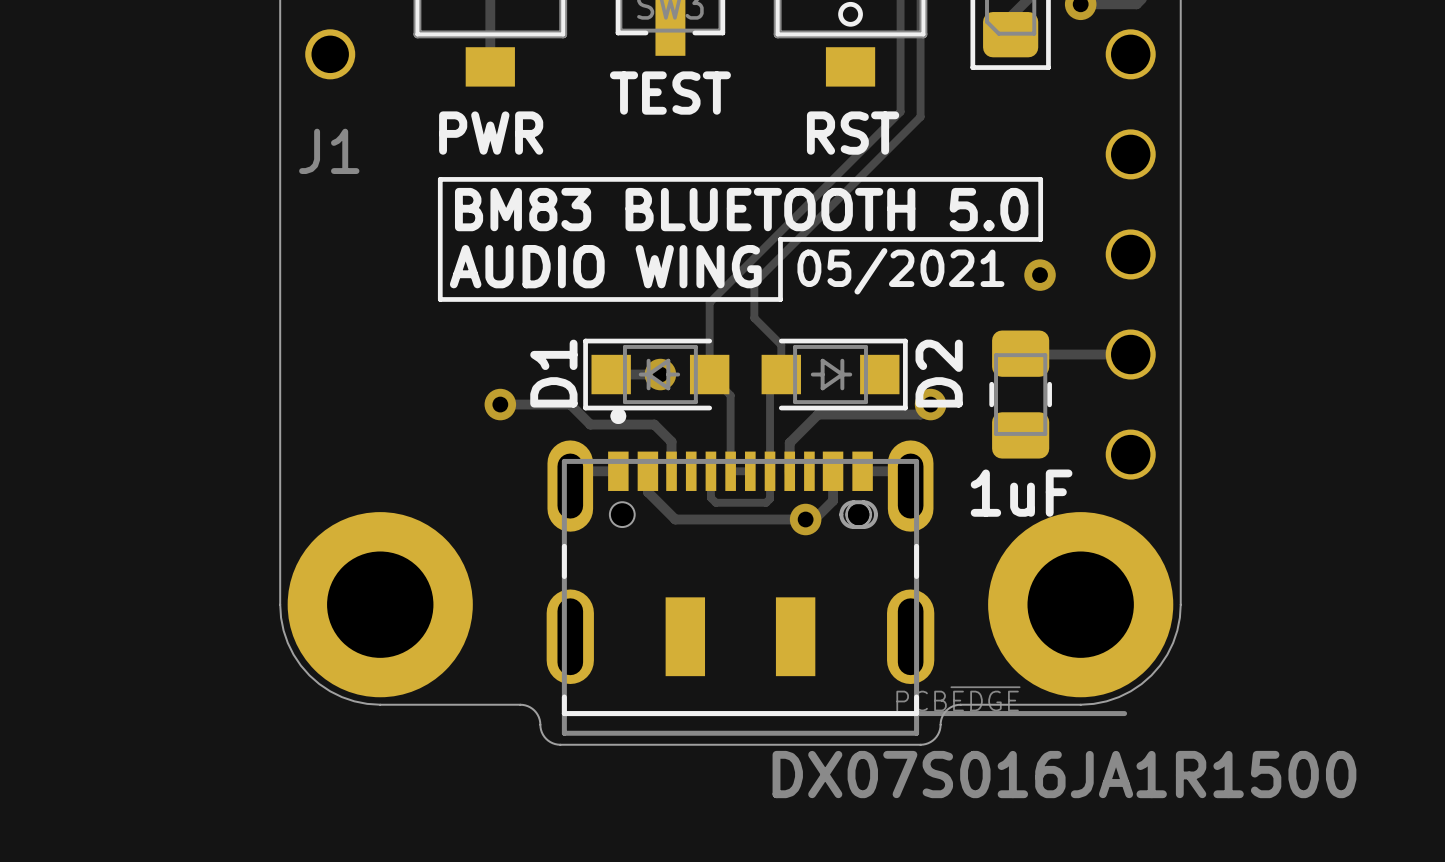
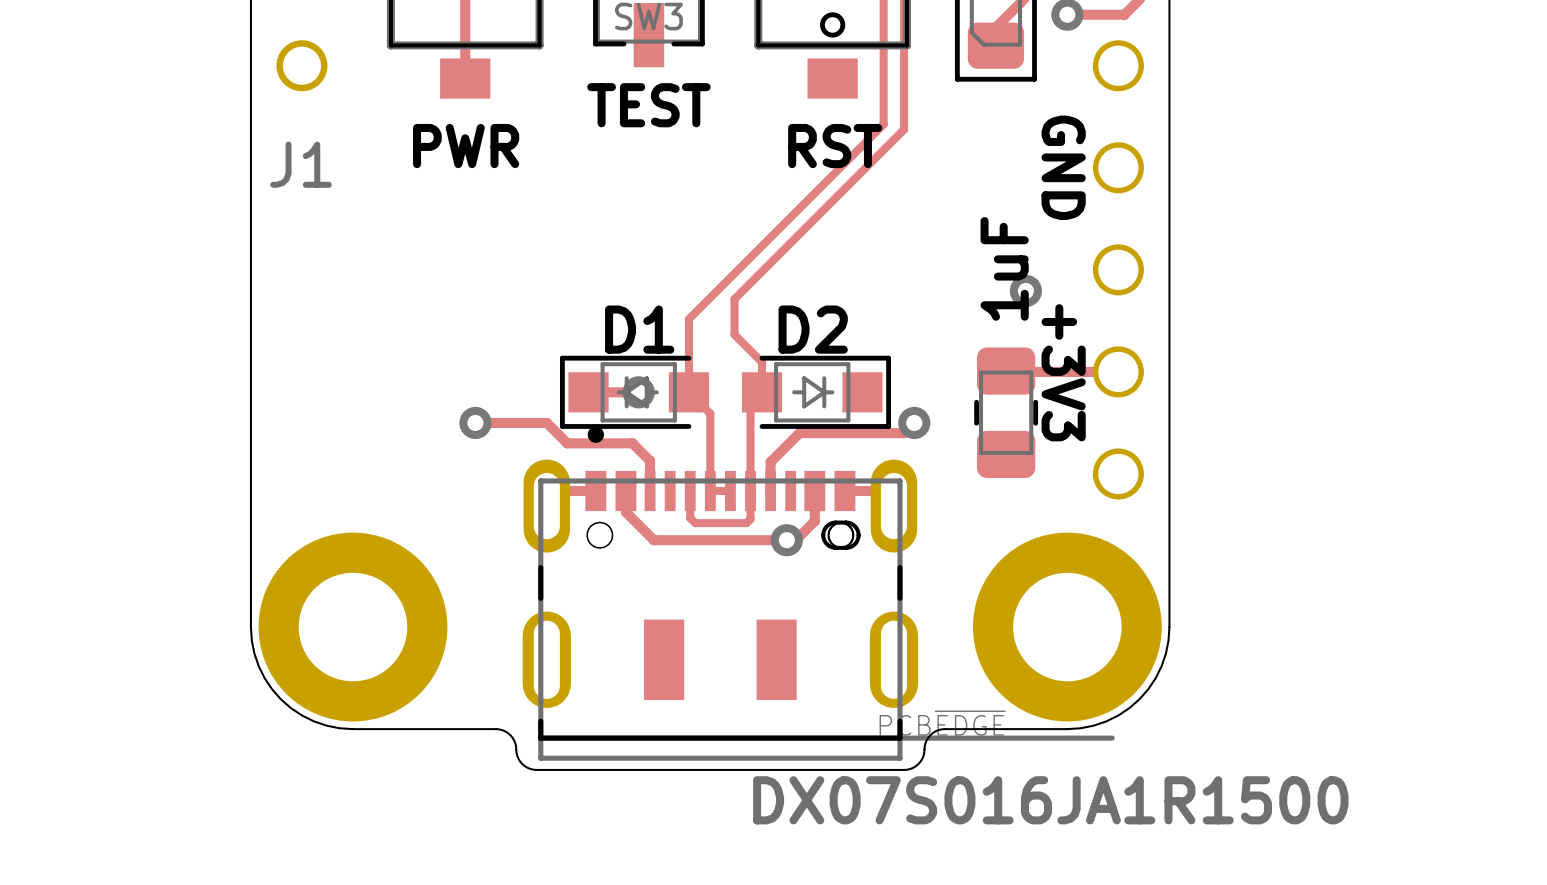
text: none -> GND (1063, 167)
line: (440, 179) (440, 299) (780, 299) (780, 239) (1040, 239) (1040, 179) (440, 179) -> none
text: BM83 BLUETOOTH 5.0 (741, 209) -> none
text: AUDIO WING (605, 266) -> none
text: 05/2021 (900, 271) -> none
text: none -> +3V3 (1063, 372)
D1 name rotation: 0° (553, 373) -> 90° clockwise (639, 329)
D1 name position: D1 (553, 373) -> D1 (639, 329)
D2 name rotation: 0° (939, 373) -> 90° clockwise (813, 329)
D2 name position: D2 (939, 373) -> D2 (813, 329)
part value rotation: 0° (1021, 493) -> 90° counterclockwise (1004, 268)
part value position: 1uF (1021, 493) -> 1uF (1004, 268)

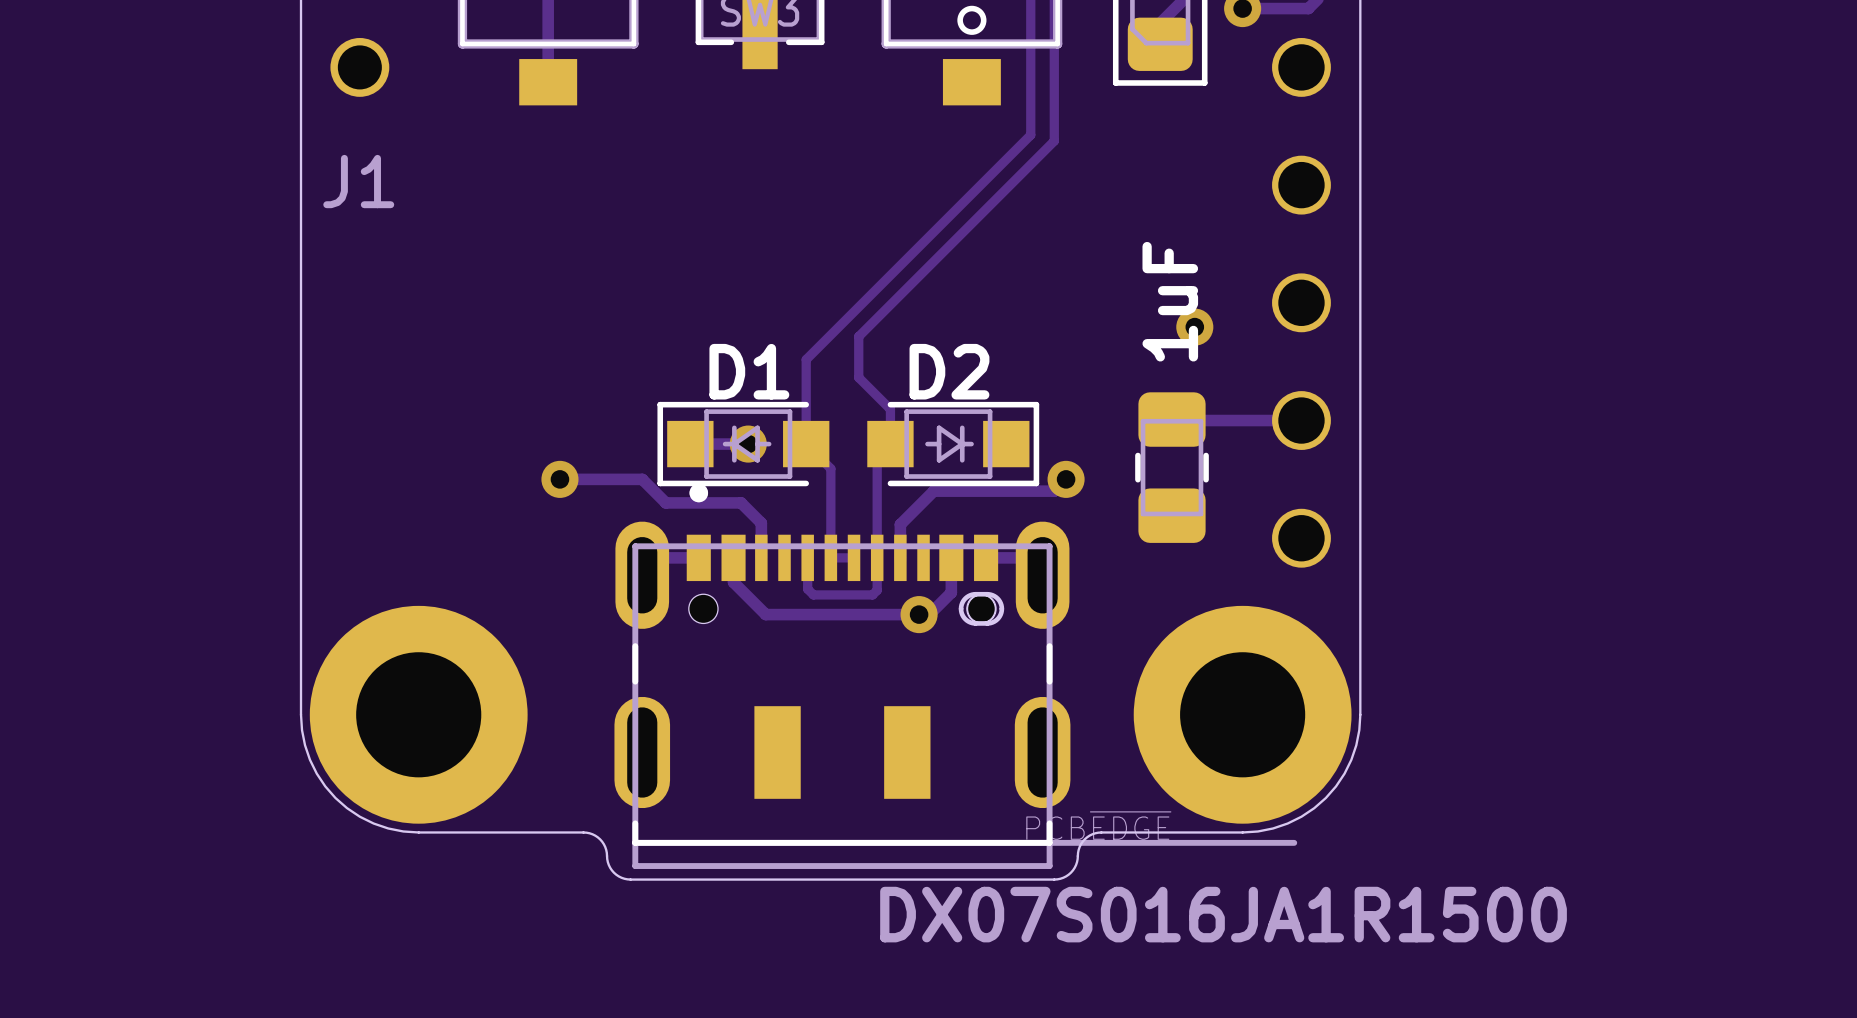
text: TEST (648, 105) -> none
text: PWR (466, 146) -> none
text: RST (835, 146) -> none
text: GND (1063, 167) -> none
text: +3V3 (1063, 372) -> none

